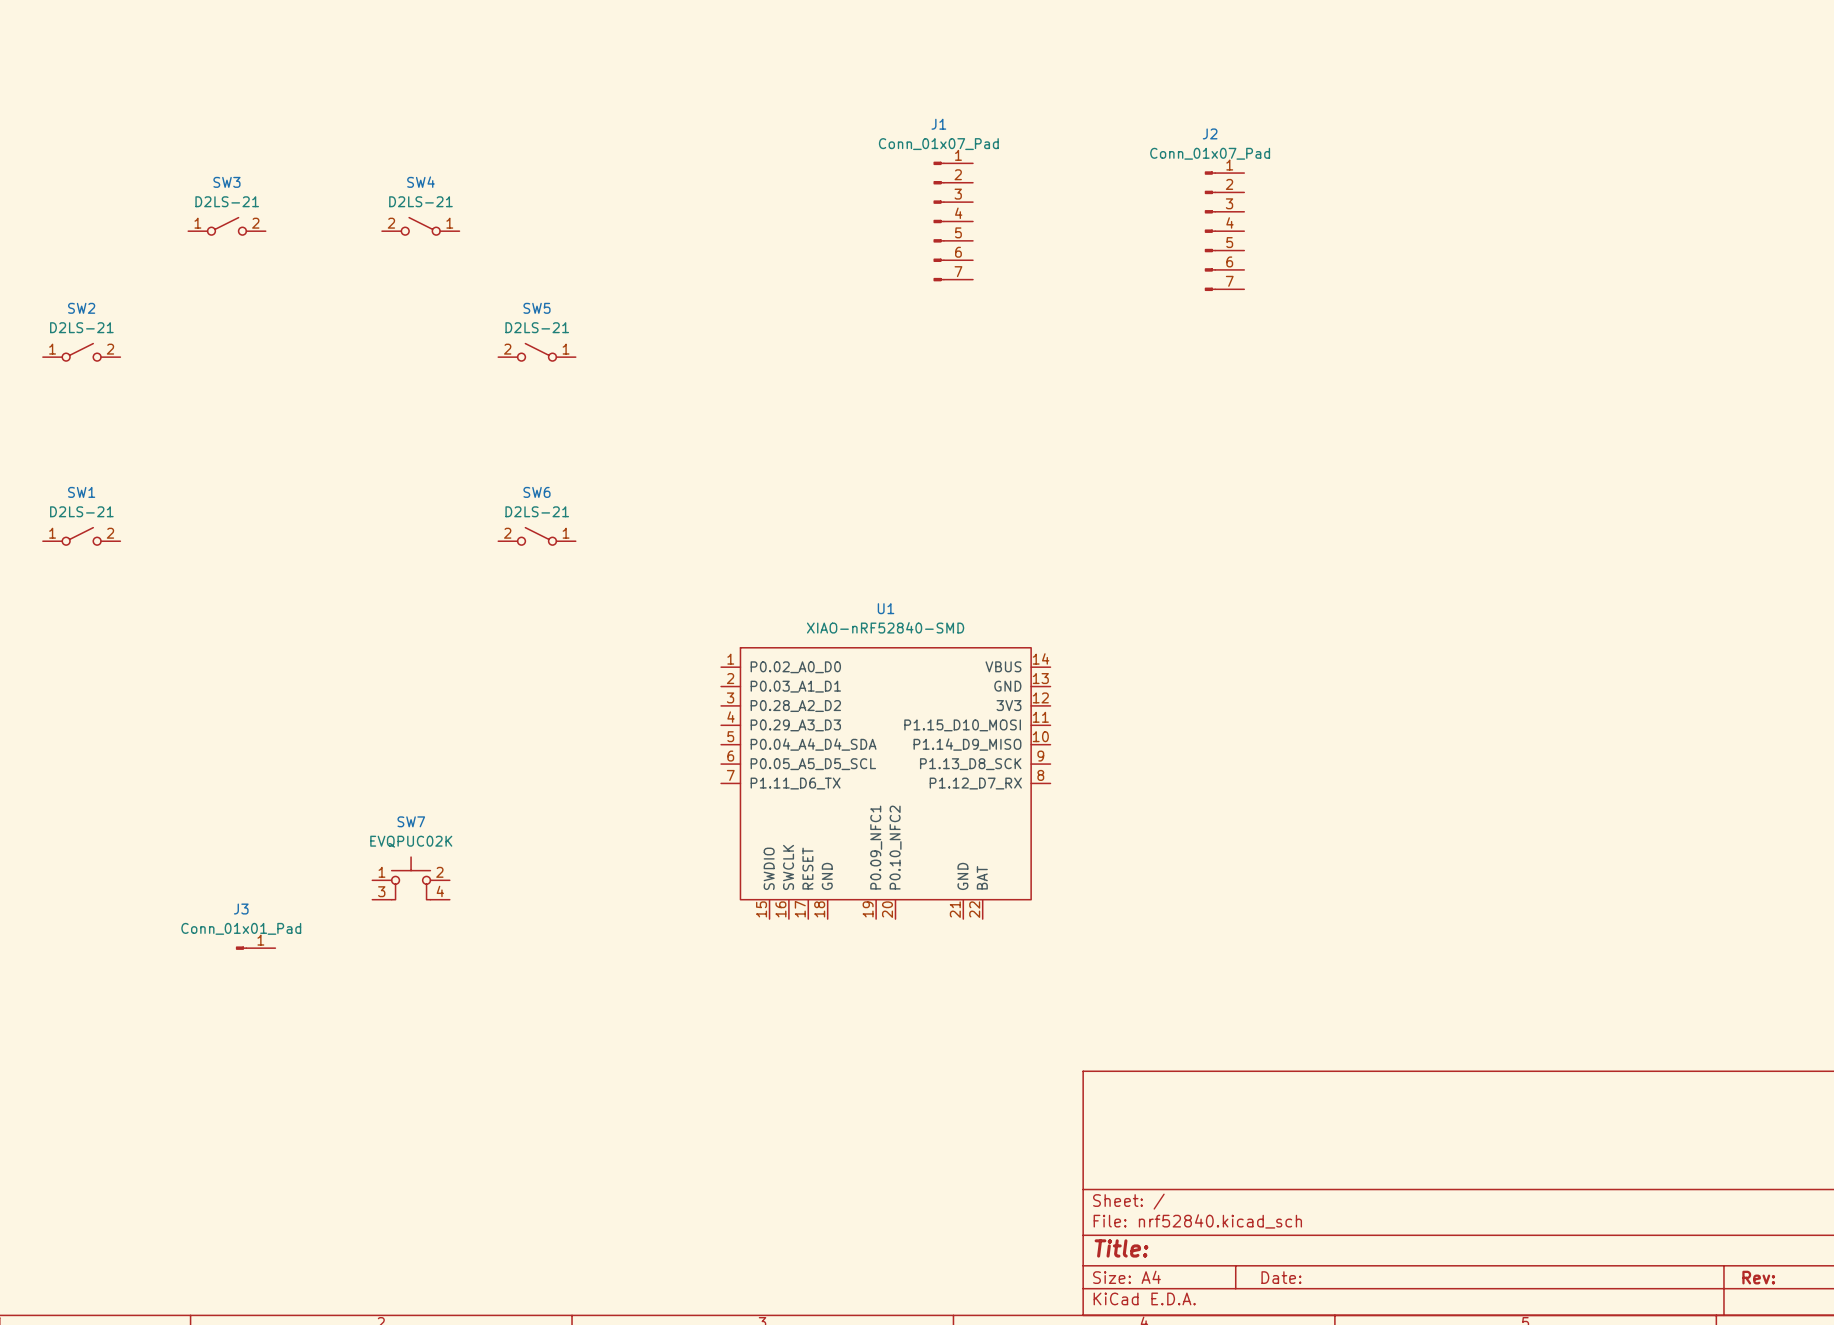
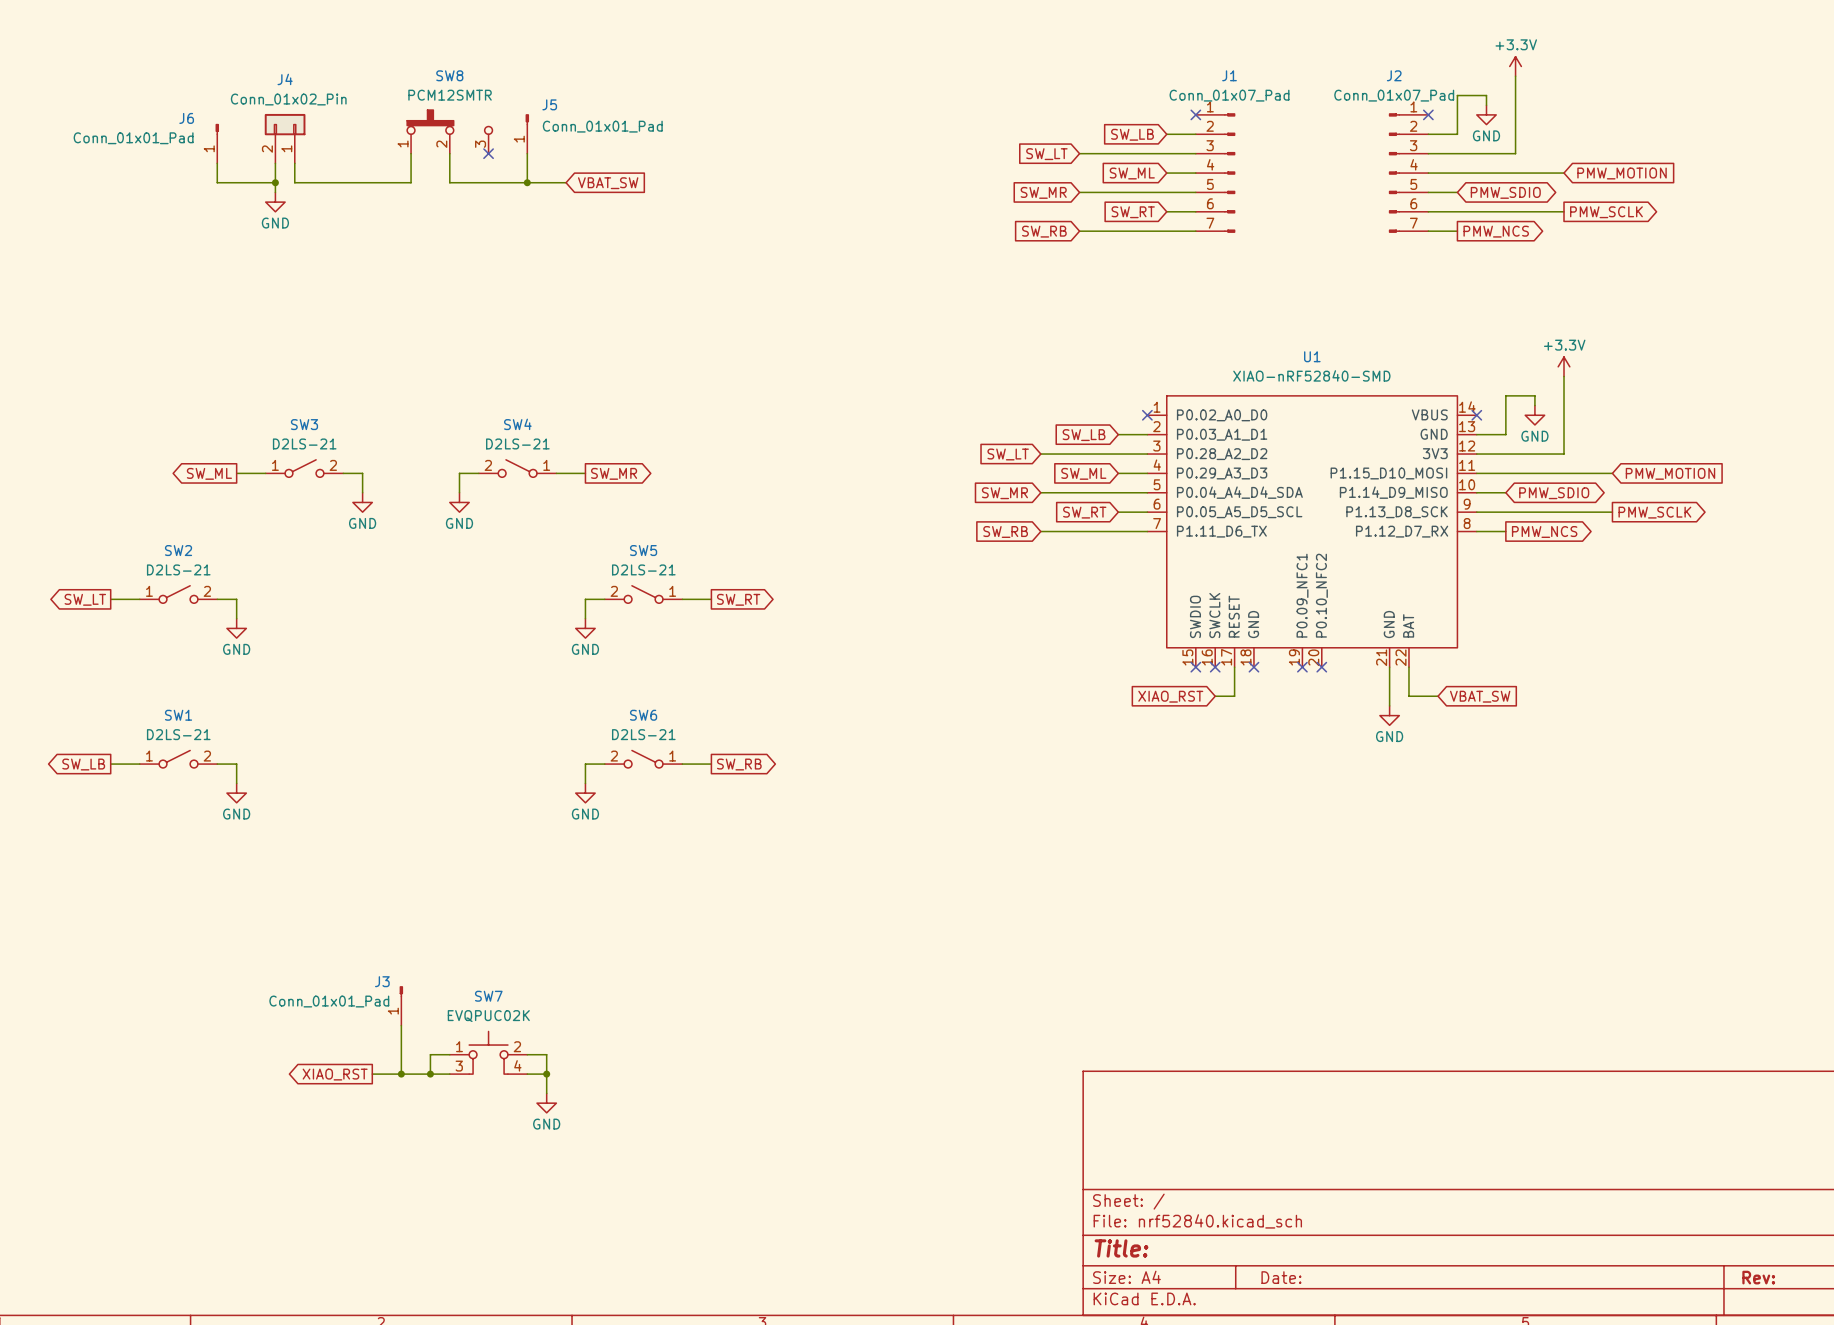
power symbol: none -> +3.3V (1515, 66)
wire: none -> (1515, 76) (1515, 153) (1428, 153)
wire: none -> (1486, 105) (1486, 95) (1457, 95) (1457, 134) (1428, 134)
no-connect mark: none -> (1195, 114)
no-connect mark: none -> (1428, 114)
power symbol: none -> GND (1486, 114)
SW8: none -> PCM12SMTR (449, 131)
J5: none -> Conn_01x01_Pad (527, 134)
global label: none -> SW_LB (1132, 134)
wire: none -> (1166, 134) (1195, 134)
J4: none -> Conn_01x02_Pin (285, 138)
J6: none -> Conn_01x01_Pad (217, 143)
wire: none -> (411, 153) (411, 182) (294, 182) (294, 163)
wire: none -> (449, 153) (449, 182) (566, 182)
no-connect mark: none -> (488, 153)
wire: none -> (527, 153) (527, 182)
wire: none -> (1079, 153) (1195, 153)
global label: none -> SW_LT (1046, 154)
wire: none -> (217, 163) (217, 182) (275, 182)
wire: none -> (275, 163) (275, 192)
global label: none -> SW_ML (1132, 173)
wire: none -> (1166, 173) (1195, 173)
wire: none -> (1428, 173) (1564, 173)
global label: none -> PMW_MOTION (1622, 173)
junction: none -> (275, 182)
junction: none -> (527, 182)
global label: none -> VBAT_SW (608, 183)
global label: none -> SW_MR (1043, 192)
wire: none -> (1079, 192) (1195, 192)
wire: none -> (1428, 192) (1457, 192)
global label: none -> PMW_SDIO (1505, 192)
power symbol: none -> GND (275, 202)
wire: none -> (1166, 211) (1195, 211)
wire: none -> (1428, 211) (1564, 211)
global label: none -> SW_RT (1133, 212)
global label: none -> PMW_SCLK (1606, 212)
J1 flip: as is (939, 221) -> left-right (1229, 173)
J1 position: (953, 221) -> (1215, 173)
SW3 position: (226, 226) -> (304, 468)
SW4 position: (420, 226) -> (517, 468)
global label: none -> SW_RB (1044, 231)
wire: none -> (1079, 231) (1195, 231)
J2 position: (1224, 231) -> (1408, 173)
wire: none -> (1428, 231) (1457, 231)
global label: none -> PMW_NCS (1496, 231)
SW2 position: (81, 352) -> (178, 594)
SW5 position: (537, 352) -> (643, 594)
power symbol: none -> +3.3V (1564, 366)
wire: none -> (1564, 376) (1564, 454) (1476, 454)
wire: none -> (1534, 405) (1534, 395) (1505, 395) (1505, 434) (1476, 434)
no-connect mark: none -> (1147, 415)
no-connect mark: none -> (1476, 415)
power symbol: none -> GND (1534, 415)
wire: none -> (1118, 434) (1147, 434)
global label: none -> SW_LB (1084, 435)
global label: none -> SW_LT (1008, 454)
wire: none -> (1040, 454) (1147, 454)
global label: none -> SW_ML (209, 473)
wire: none -> (236, 473) (265, 473)
wire: none -> (343, 473) (362, 473) (362, 492)
wire: none -> (478, 473) (459, 473) (459, 492)
wire: none -> (556, 473) (585, 473)
global label: none -> SW_MR (614, 473)
global label: none -> SW_ML (1083, 473)
wire: none -> (1118, 473) (1147, 473)
wire: none -> (1476, 473) (1612, 473)
global label: none -> PMW_MOTION (1670, 473)
wire: none -> (1040, 492) (1147, 492)
wire: none -> (1476, 492) (1505, 492)
global label: none -> SW_MR (1004, 493)
global label: none -> PMW_SDIO (1554, 493)
power symbol: none -> GND (362, 502)
power symbol: none -> GND (459, 502)
global label: none -> SW_RT (1084, 512)
wire: none -> (1118, 512) (1147, 512)
wire: none -> (1476, 512) (1612, 512)
global label: none -> PMW_SCLK (1654, 512)
global label: none -> SW_RB (1005, 531)
wire: none -> (1040, 531) (1147, 531)
wire: none -> (1476, 531) (1505, 531)
global label: none -> PMW_NCS (1544, 531)
SW1 position: (81, 536) -> (178, 759)
SW6 position: (537, 536) -> (643, 759)
global label: none -> SW_LT (85, 599)
wire: none -> (110, 599) (139, 599)
wire: none -> (217, 599) (236, 599) (236, 618)
wire: none -> (604, 599) (585, 599) (585, 618)
wire: none -> (682, 599) (711, 599)
global label: none -> SW_RT (738, 599)
power symbol: none -> GND (236, 628)
power symbol: none -> GND (585, 628)
no-connect mark: none -> (1195, 667)
no-connect mark: none -> (1215, 667)
wire: none -> (1234, 667) (1234, 696) (1215, 696)
no-connect mark: none -> (1253, 667)
no-connect mark: none -> (1302, 667)
no-connect mark: none -> (1321, 667)
wire: none -> (1389, 667) (1389, 705)
wire: none -> (1408, 667) (1408, 696) (1438, 696)
global label: none -> XIAO_RST (1170, 696)
global label: none -> VBAT_SW (1480, 696)
power symbol: none -> GND (1389, 715)
global label: none -> SW_LB (83, 764)
wire: none -> (110, 764) (139, 764)
wire: none -> (217, 764) (236, 764) (236, 783)
wire: none -> (604, 764) (585, 764) (585, 783)
wire: none -> (682, 764) (711, 764)
global label: none -> SW_RB (739, 764)
U1 position: (885, 783) -> (1312, 531)
power symbol: none -> GND (236, 793)
power symbol: none -> GND (585, 793)
SW7 position: (411, 878) -> (488, 1052)
J3 name position: J3 (241, 909) -> J3 (382, 981)
J3 value position: Conn_01x01_Pad (241, 928) -> Conn_01x01_Pad (329, 1001)
J3 rotation: 0° (241, 948) -> 90° clockwise (401, 991)
J3 position: (255, 948) -> (401, 1005)
wire: none -> (401, 1025) (401, 1074)
wire: none -> (449, 1054) (430, 1054) (430, 1074)
wire: none -> (527, 1054) (546, 1054) (546, 1093)
global label: none -> XIAO_RST (335, 1074)
wire: none -> (372, 1074) (449, 1074)
junction: none -> (401, 1074)
junction: none -> (430, 1074)
wire: none -> (527, 1074) (546, 1074)
junction: none -> (546, 1074)
power symbol: none -> GND (546, 1103)

